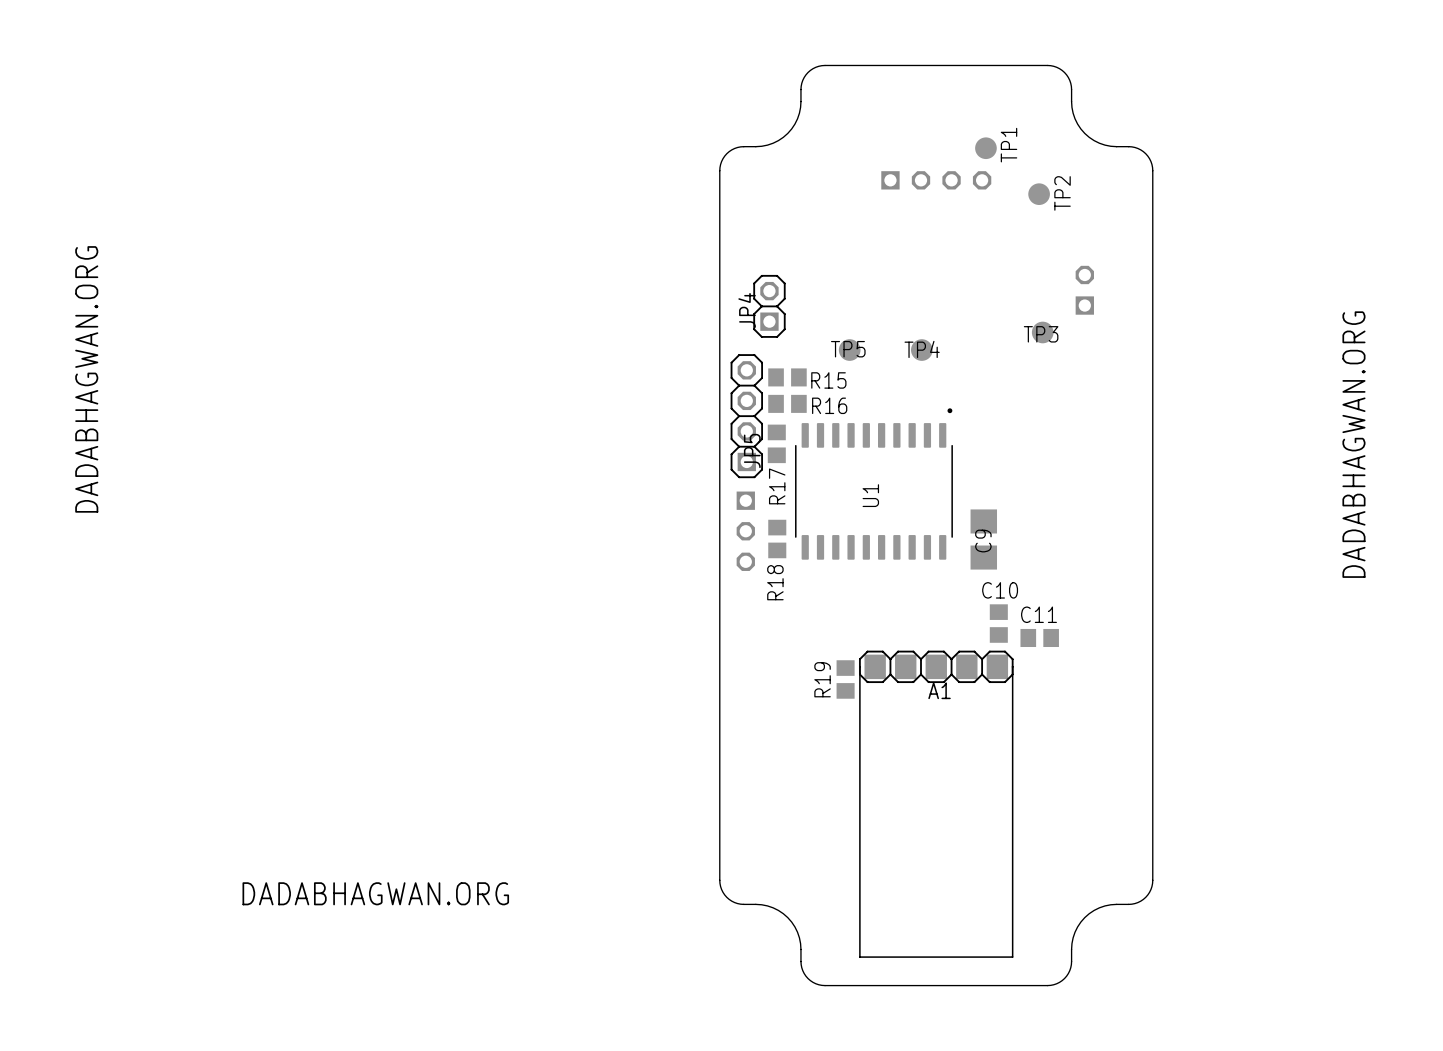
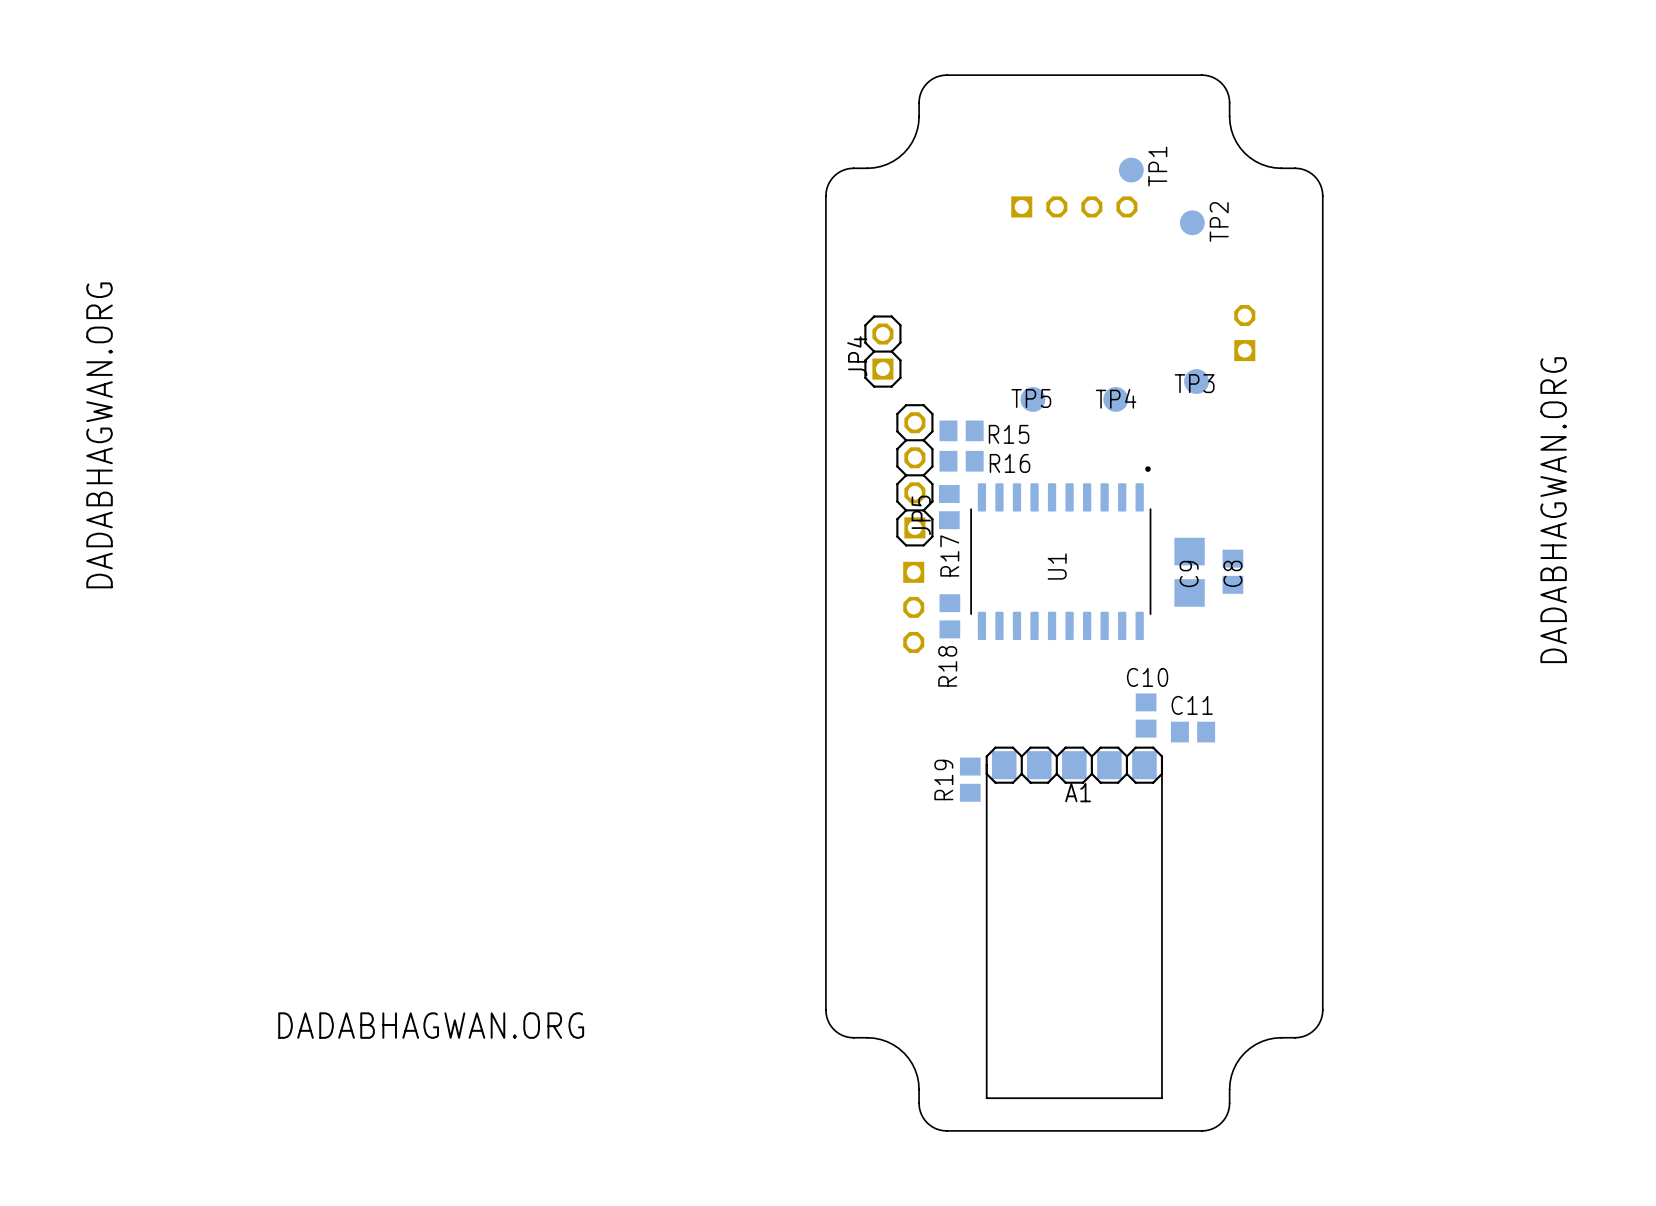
TP5 position: (849, 350) -> (1032, 399)
TP4 position: (921, 350) -> (1115, 399)
R15 position: (787, 377) -> (961, 430)
R16 position: (787, 403) -> (961, 461)
JP5 position: (746, 416) -> (914, 475)
R17 position: (776, 443) -> (949, 507)
U1 position: (873, 484) -> (1060, 553)
C8: none -> (1232, 571)
part position: (745, 531) -> (913, 607)
R18 position: (777, 539) -> (949, 616)
C9 position: (983, 539) -> (1189, 572)

